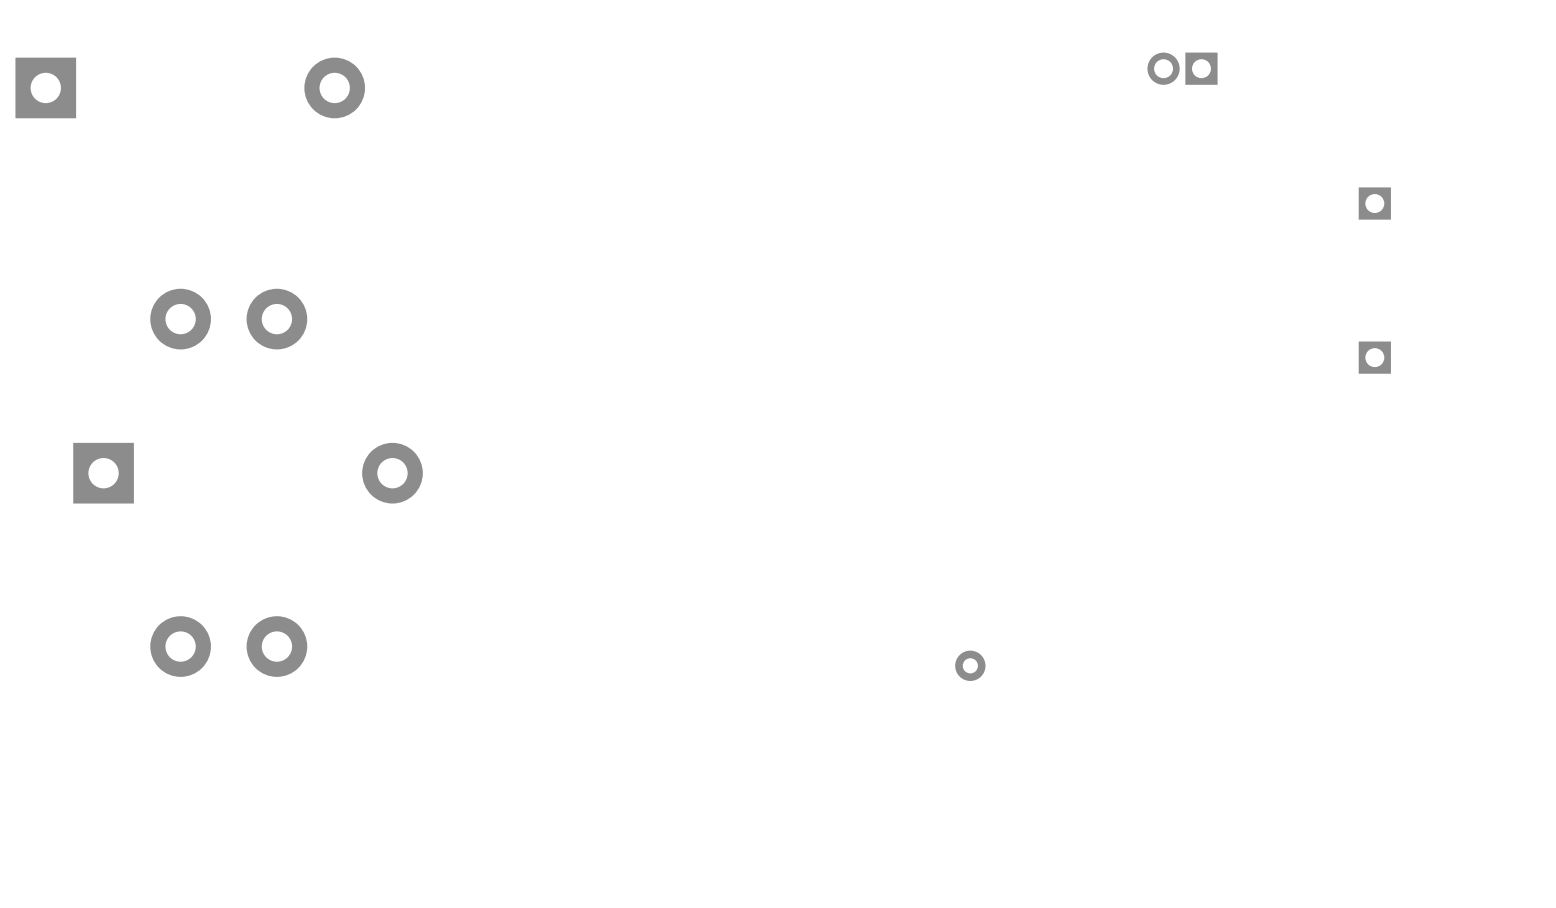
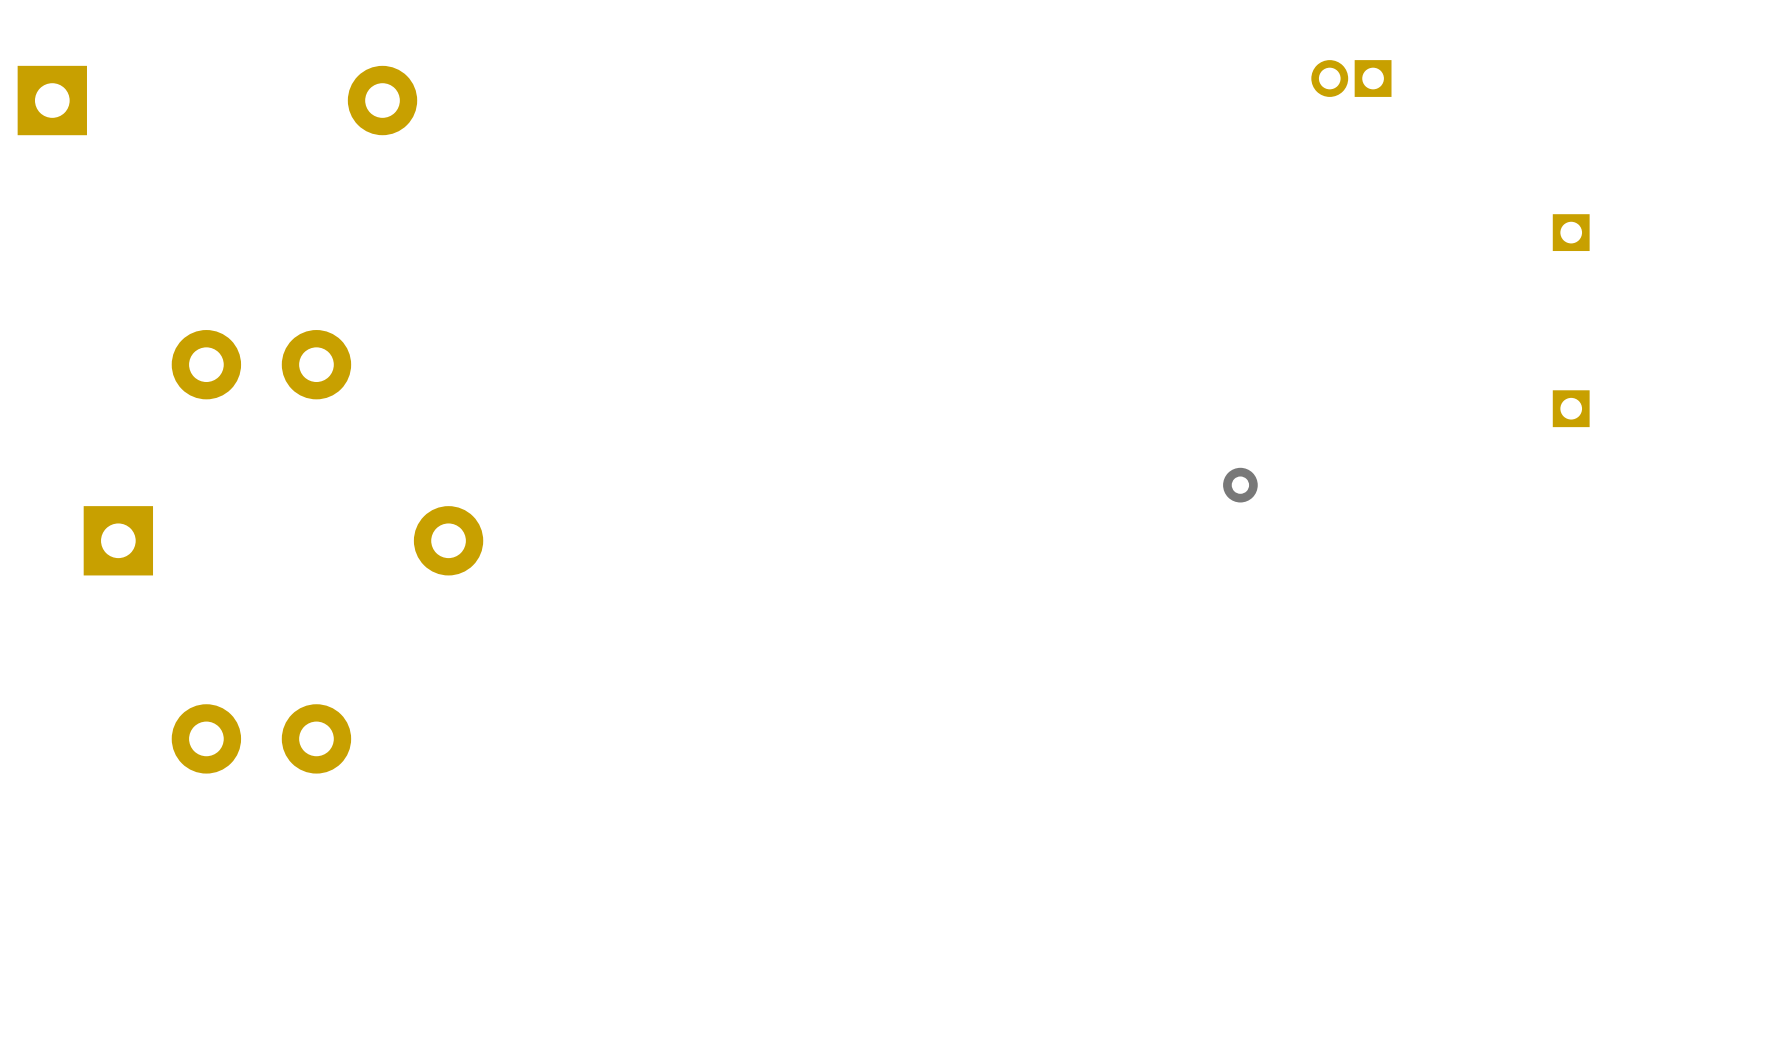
via: none -> (1240, 485)
via: (970, 665) -> none

